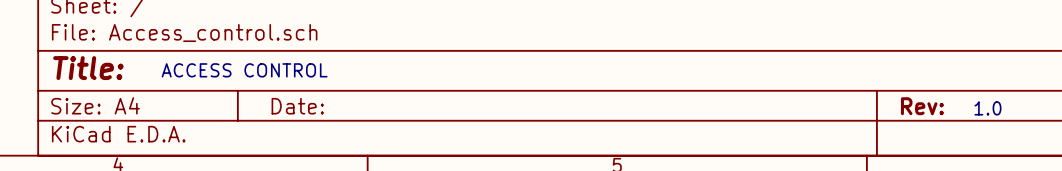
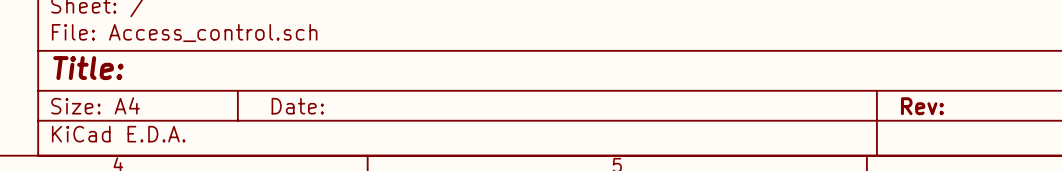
text: ACCESS CONTROL (244, 70) -> none
text: 1.0 (987, 108) -> none

